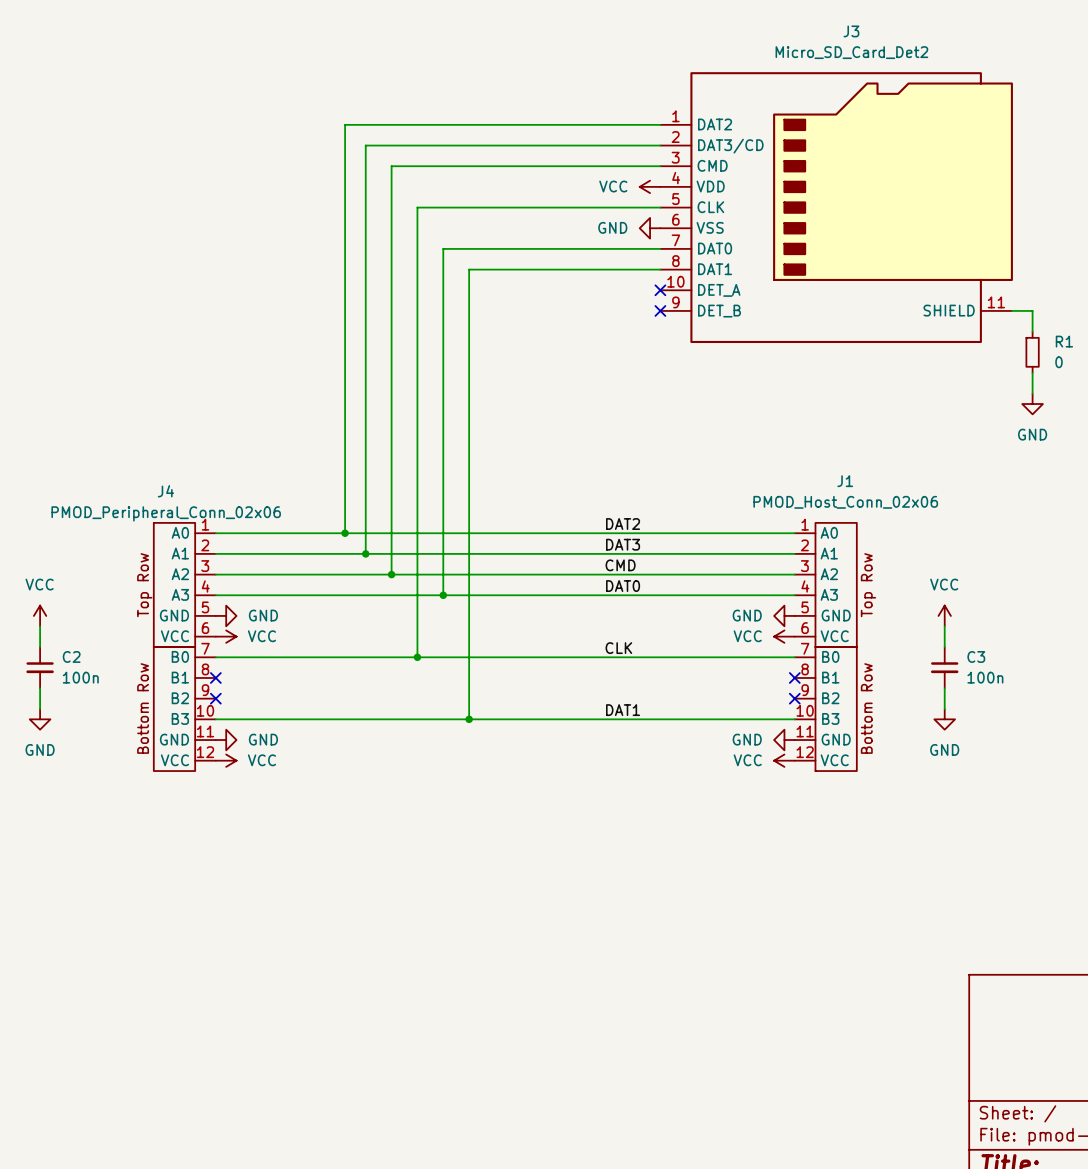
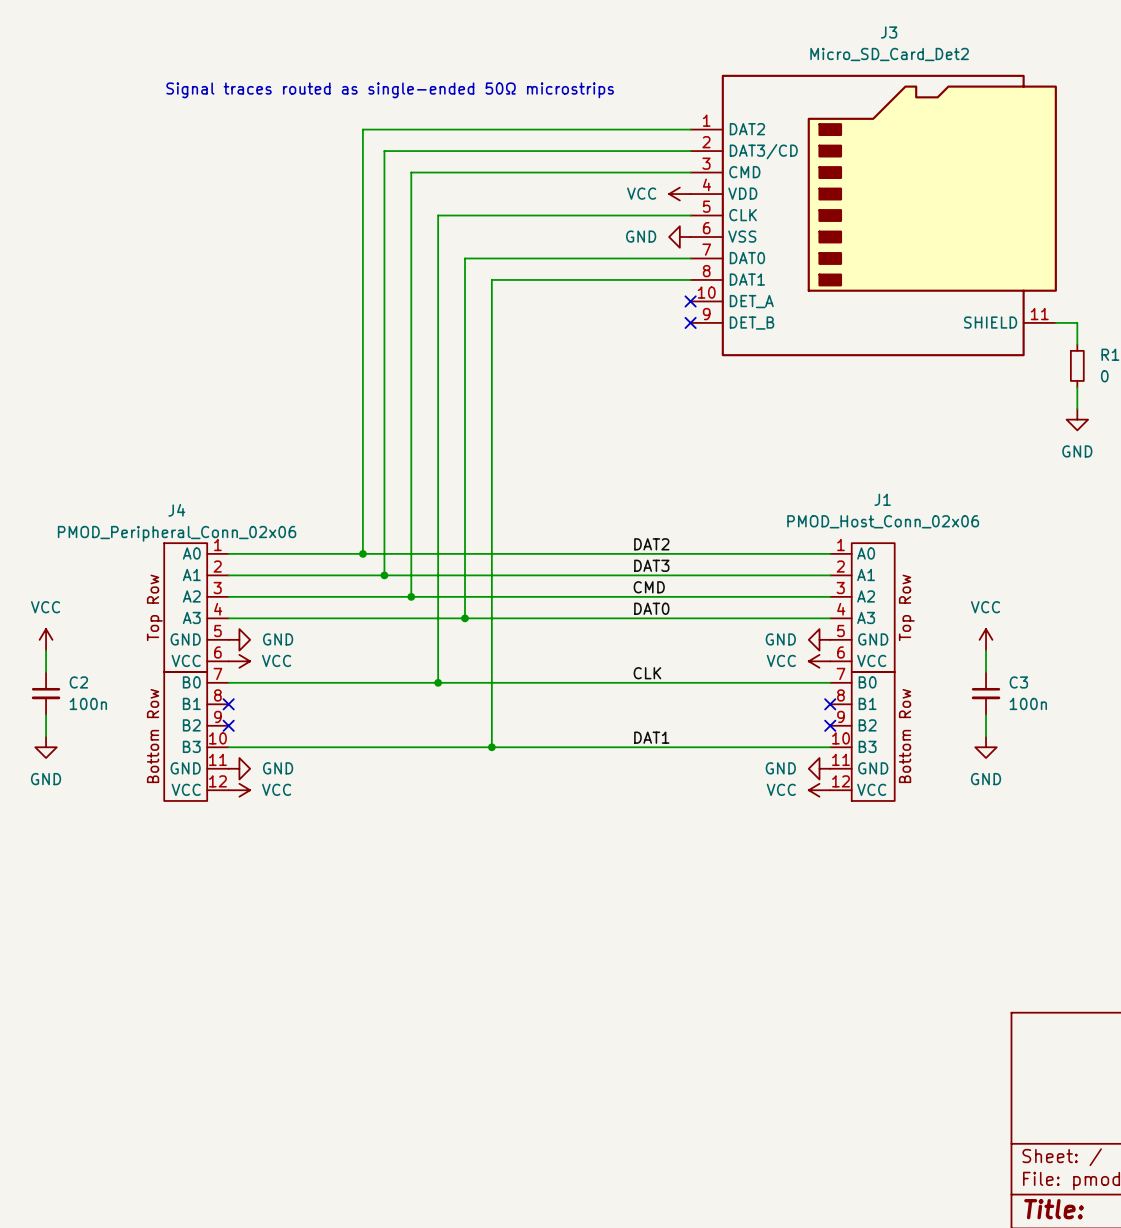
text: none -> Signal traces routed as single-ended 50Ω microstrips (390, 90)

